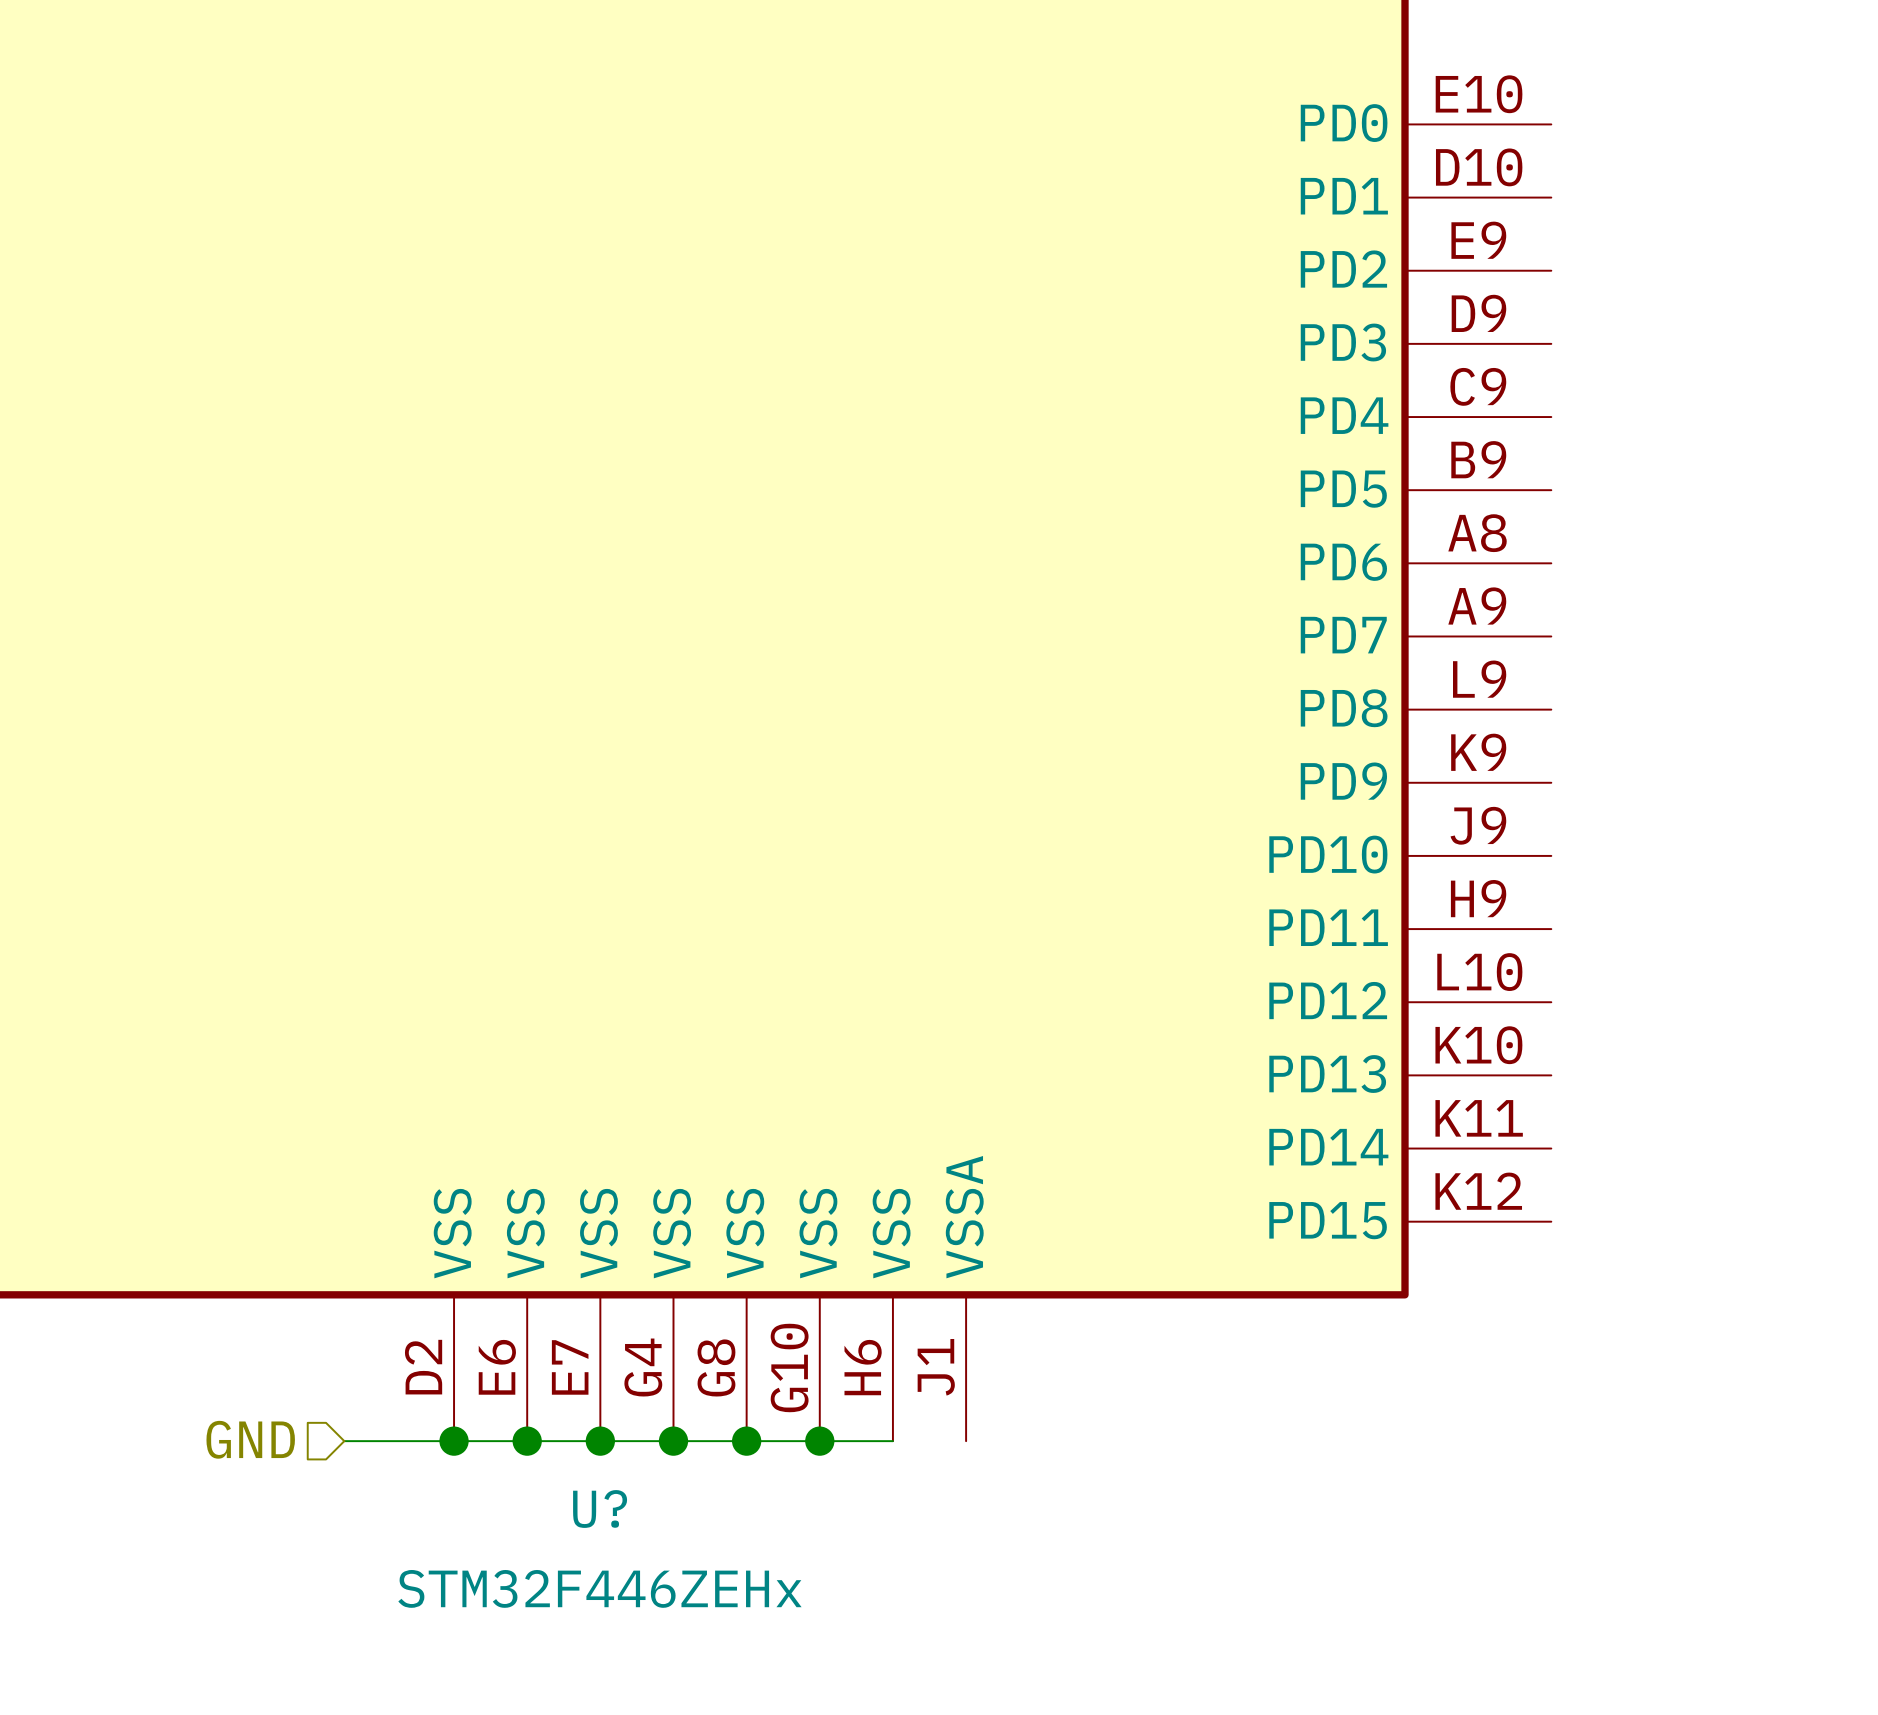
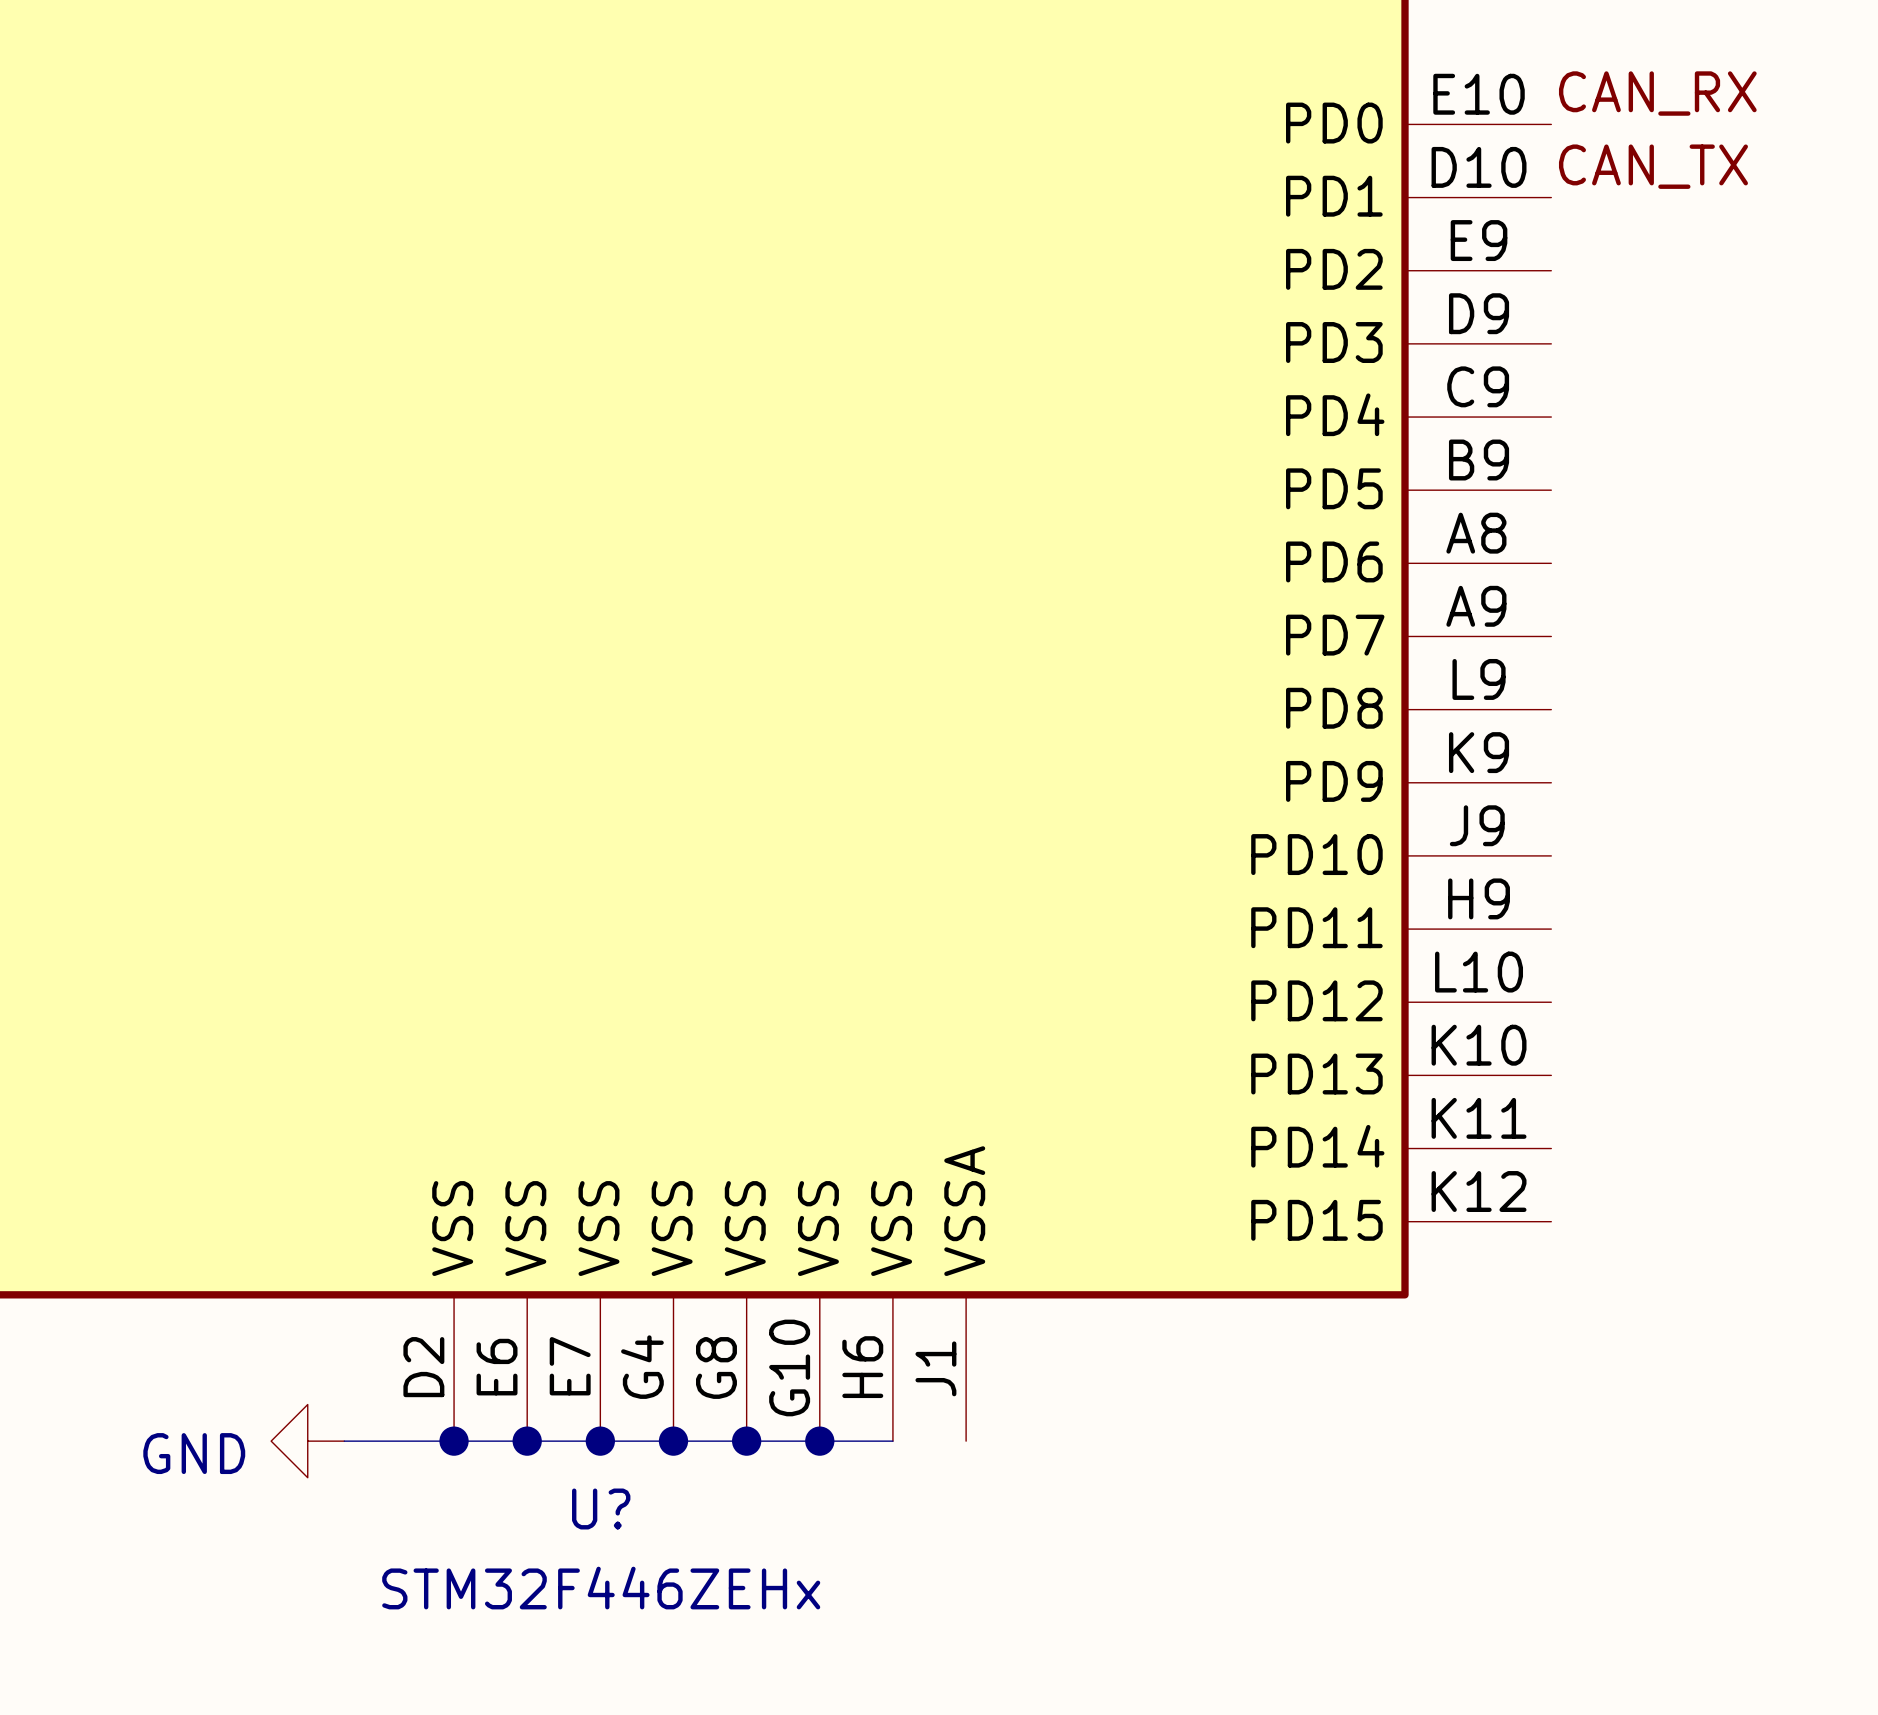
label: none -> CAN_RX (1657, 93)
label: none -> CAN_TX (1653, 166)
hierarchical label: GND (250, 1439) -> none
power symbol: none -> GND (307, 1441)

